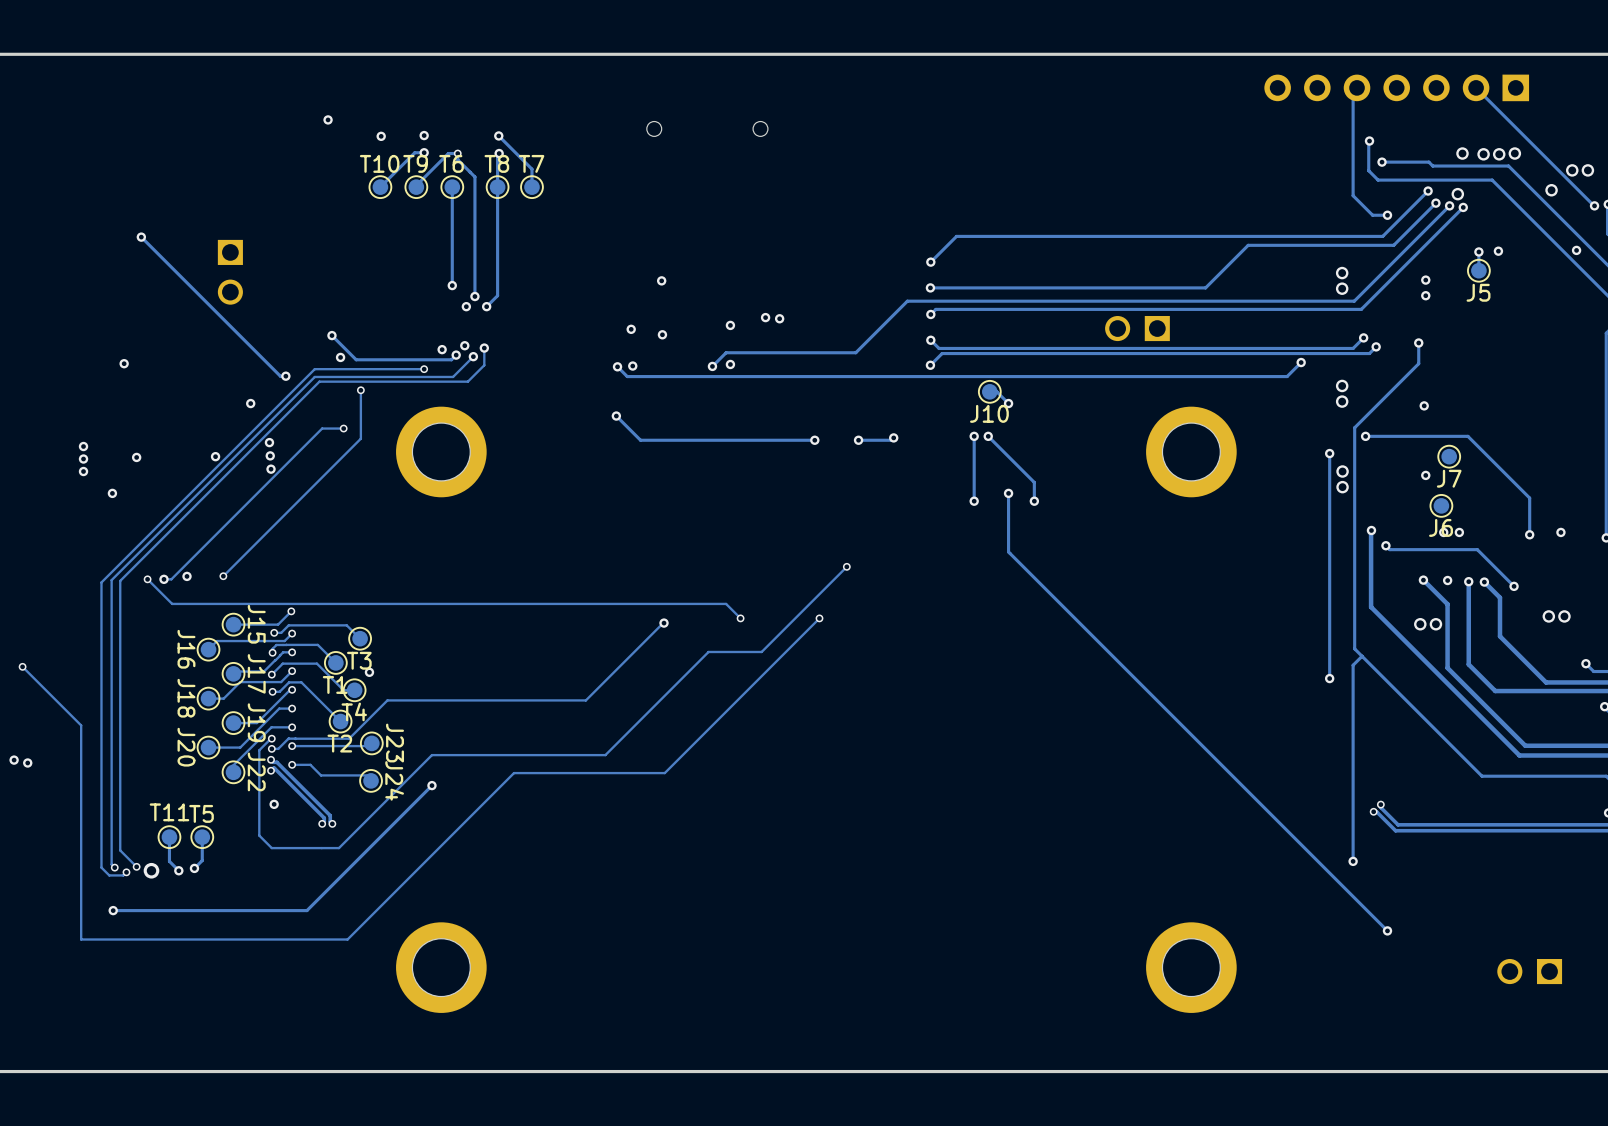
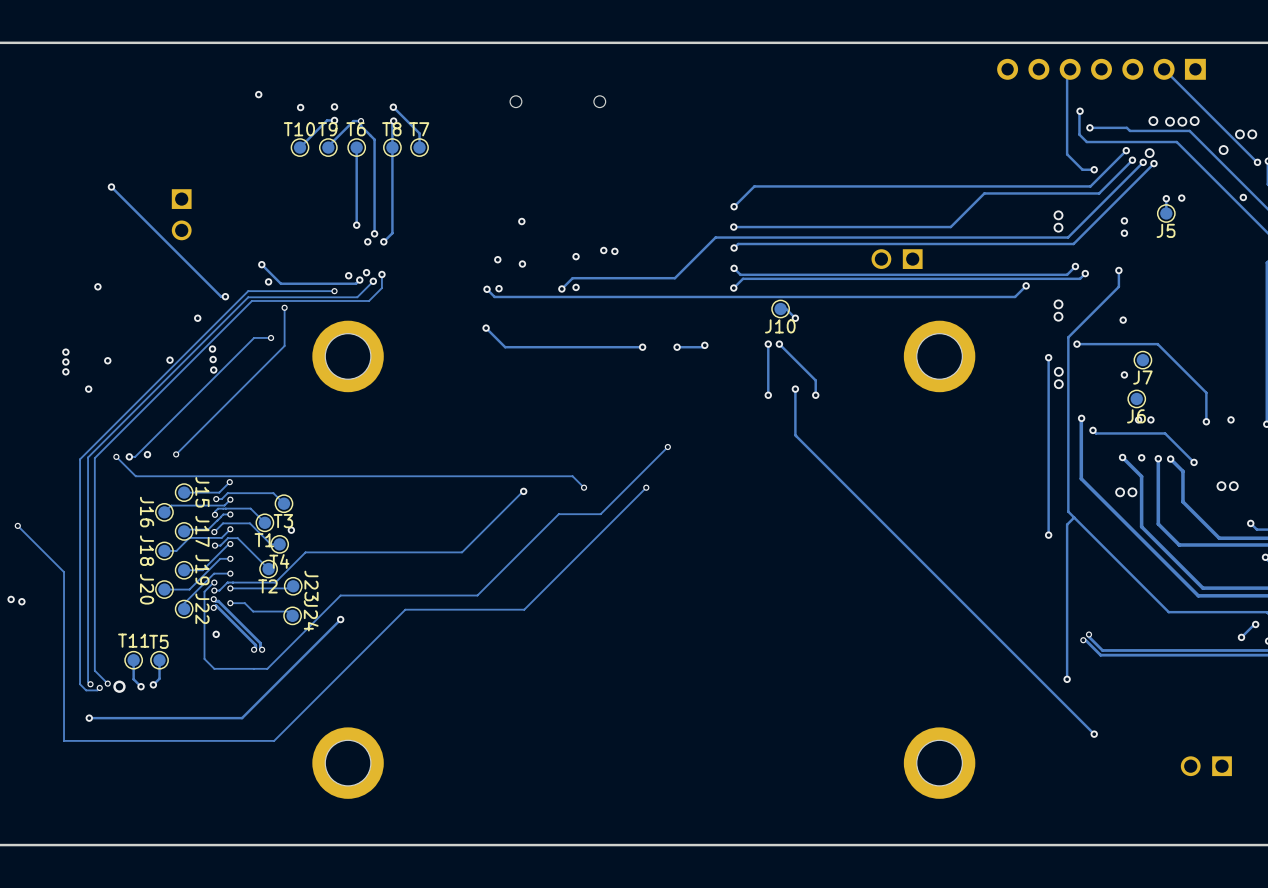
track: none -> (1255, 624) (1241, 637)
via: none -> (1255, 624)
via: none -> (1241, 637)

